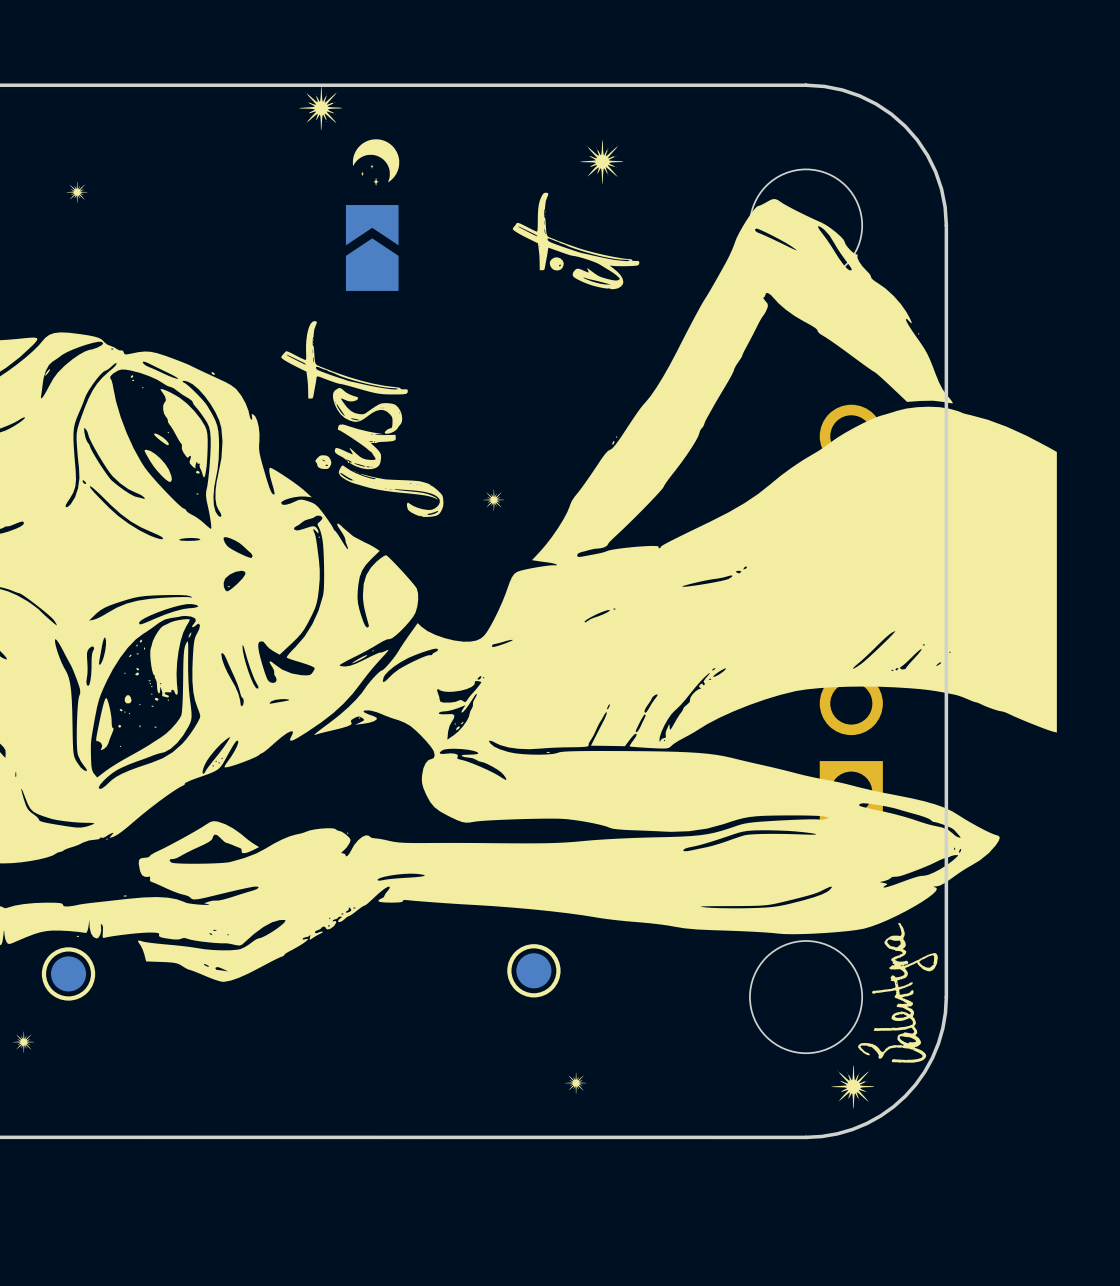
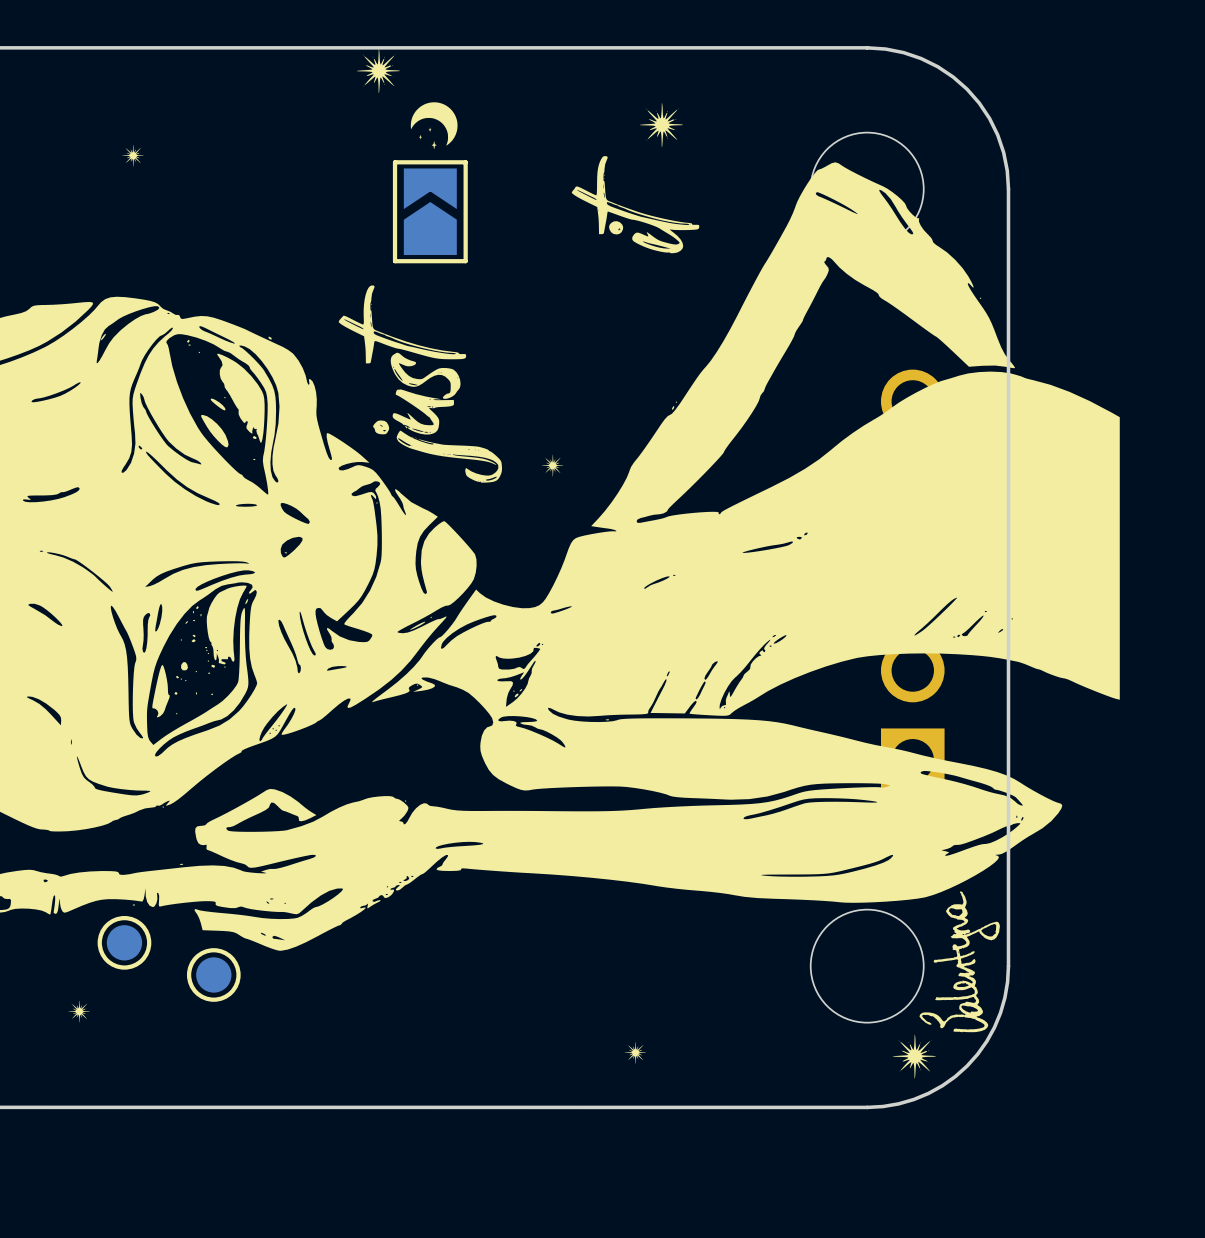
part footprint: [345, 205, 399, 291] -> [392, 160, 468, 264]
part position: (533, 970) -> (213, 974)

